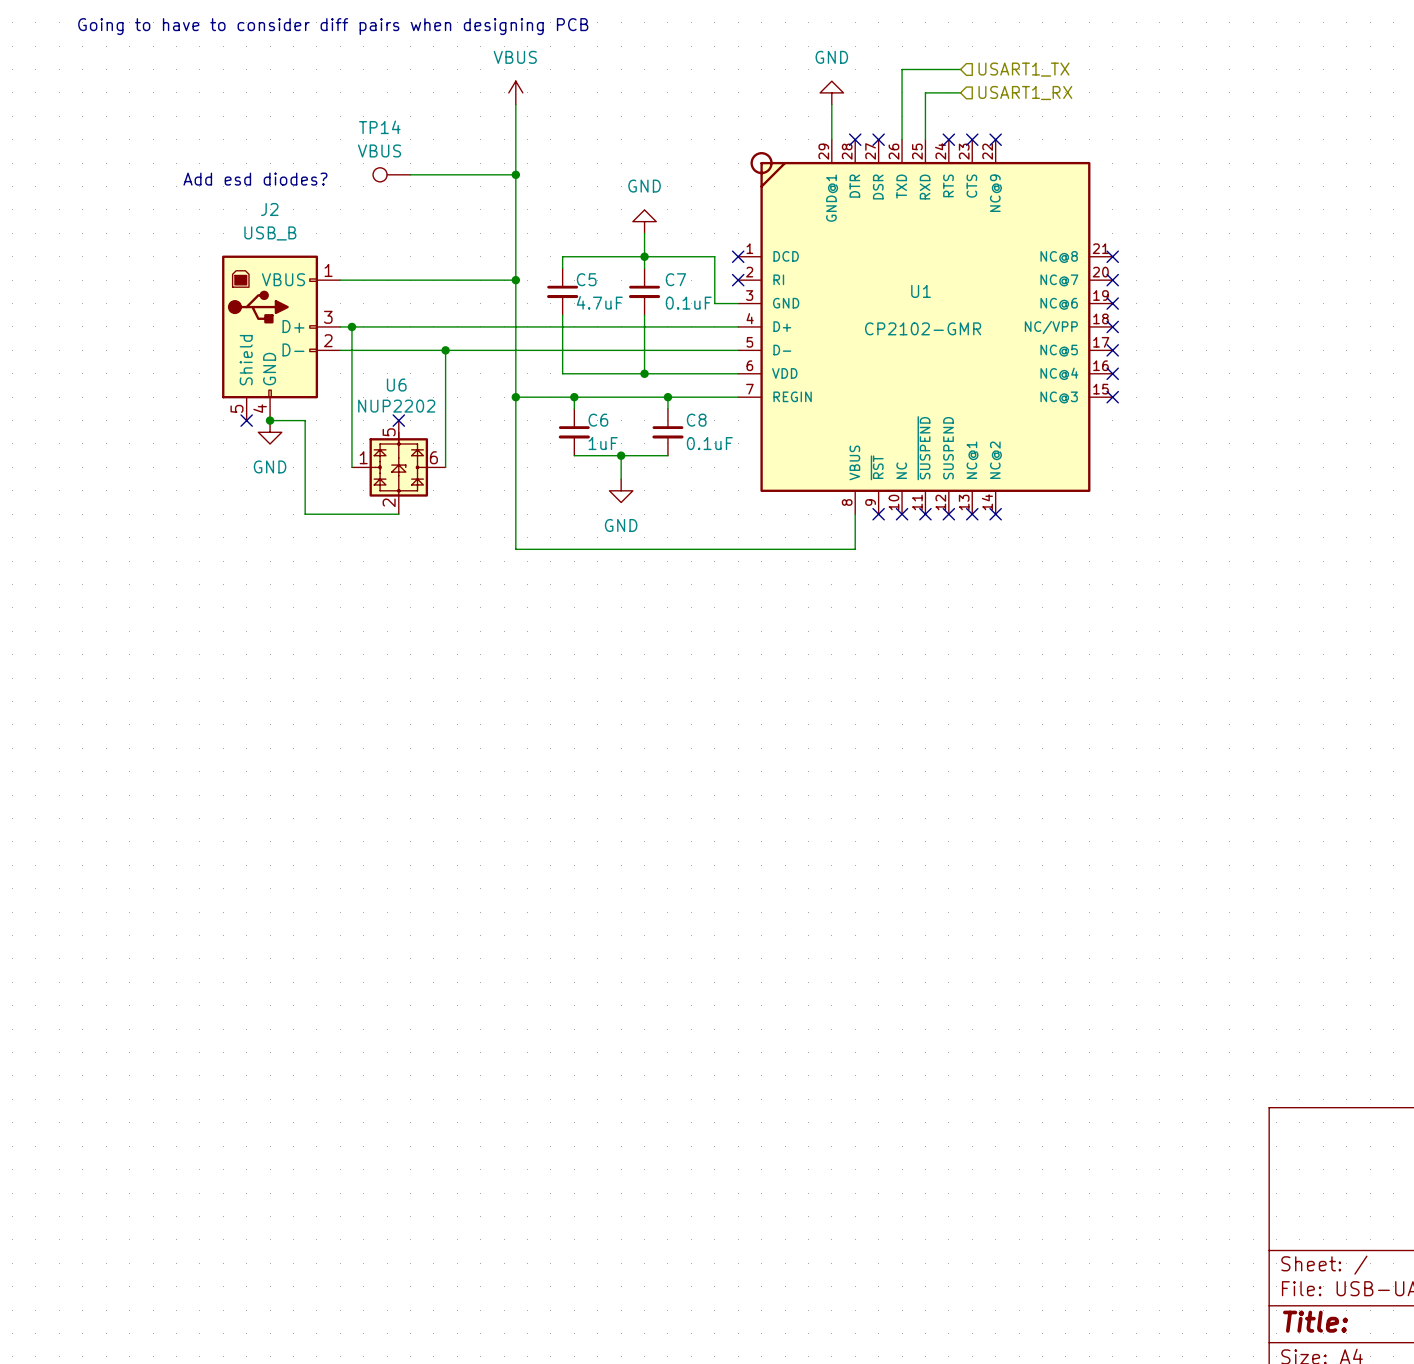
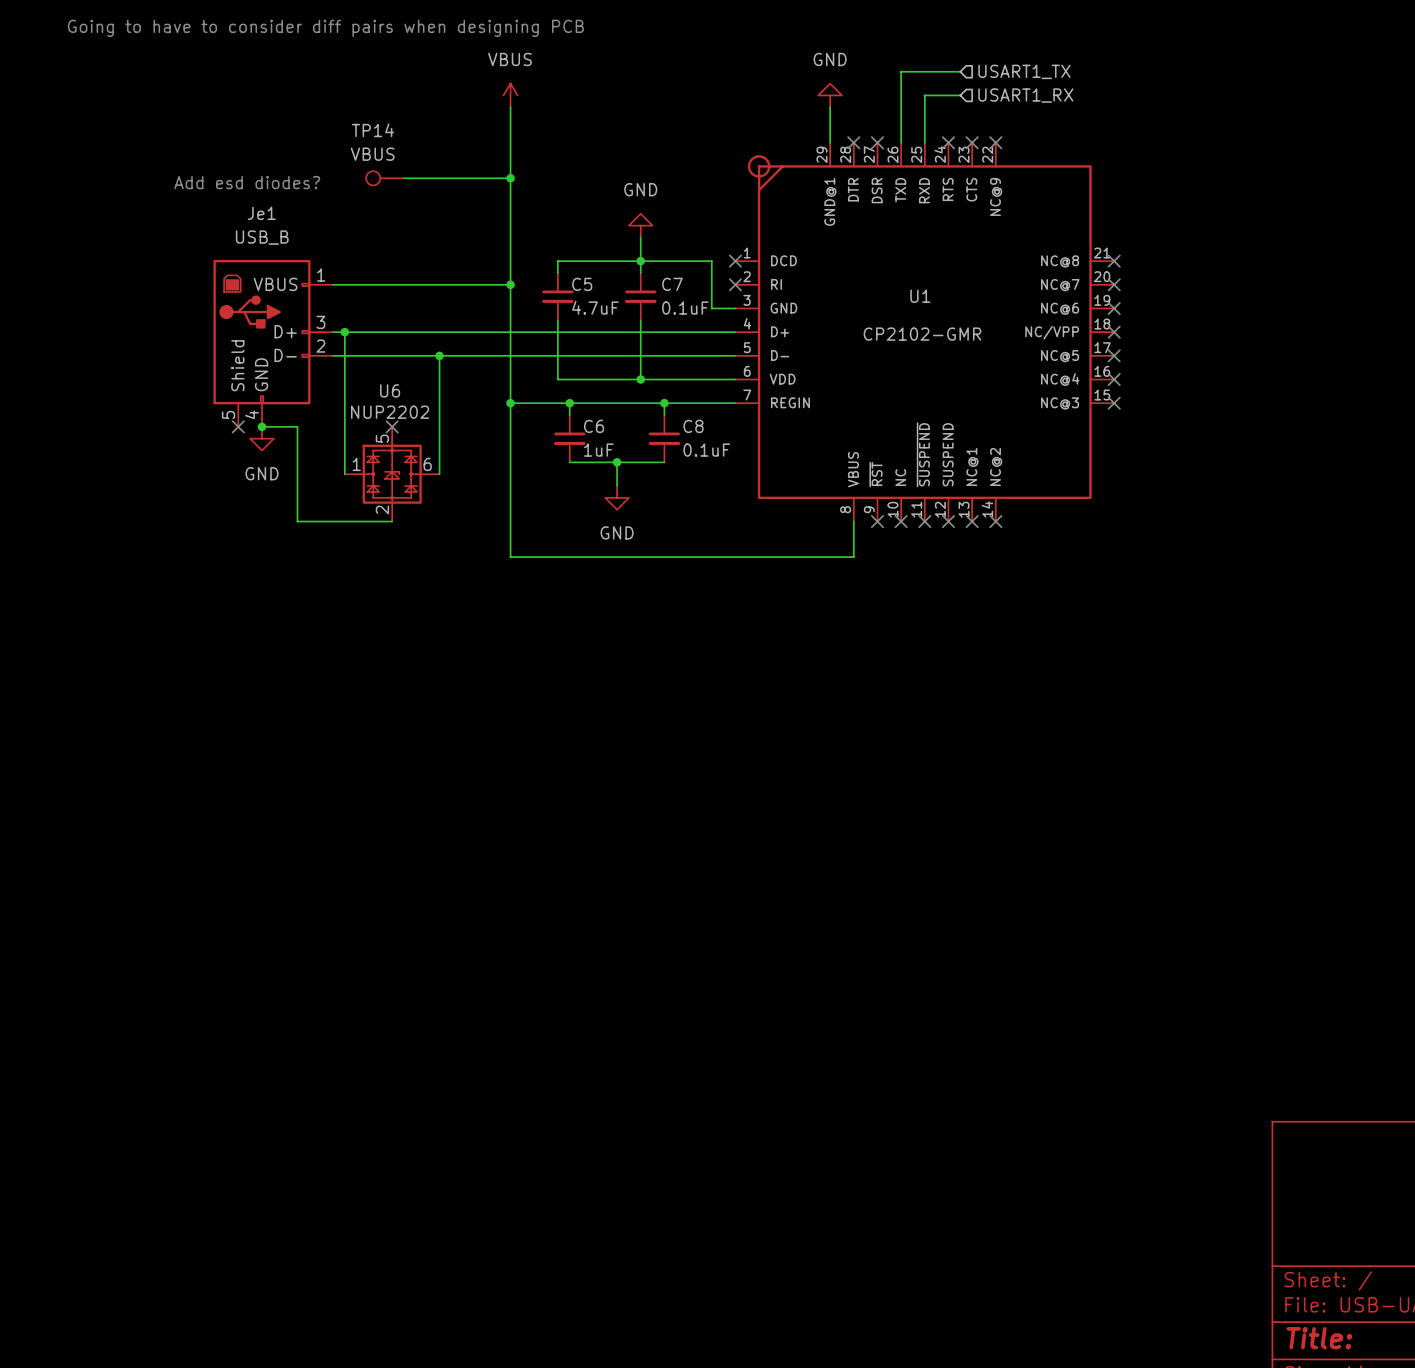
J2 name: J2 (269, 209) -> Je1 (261, 213)

